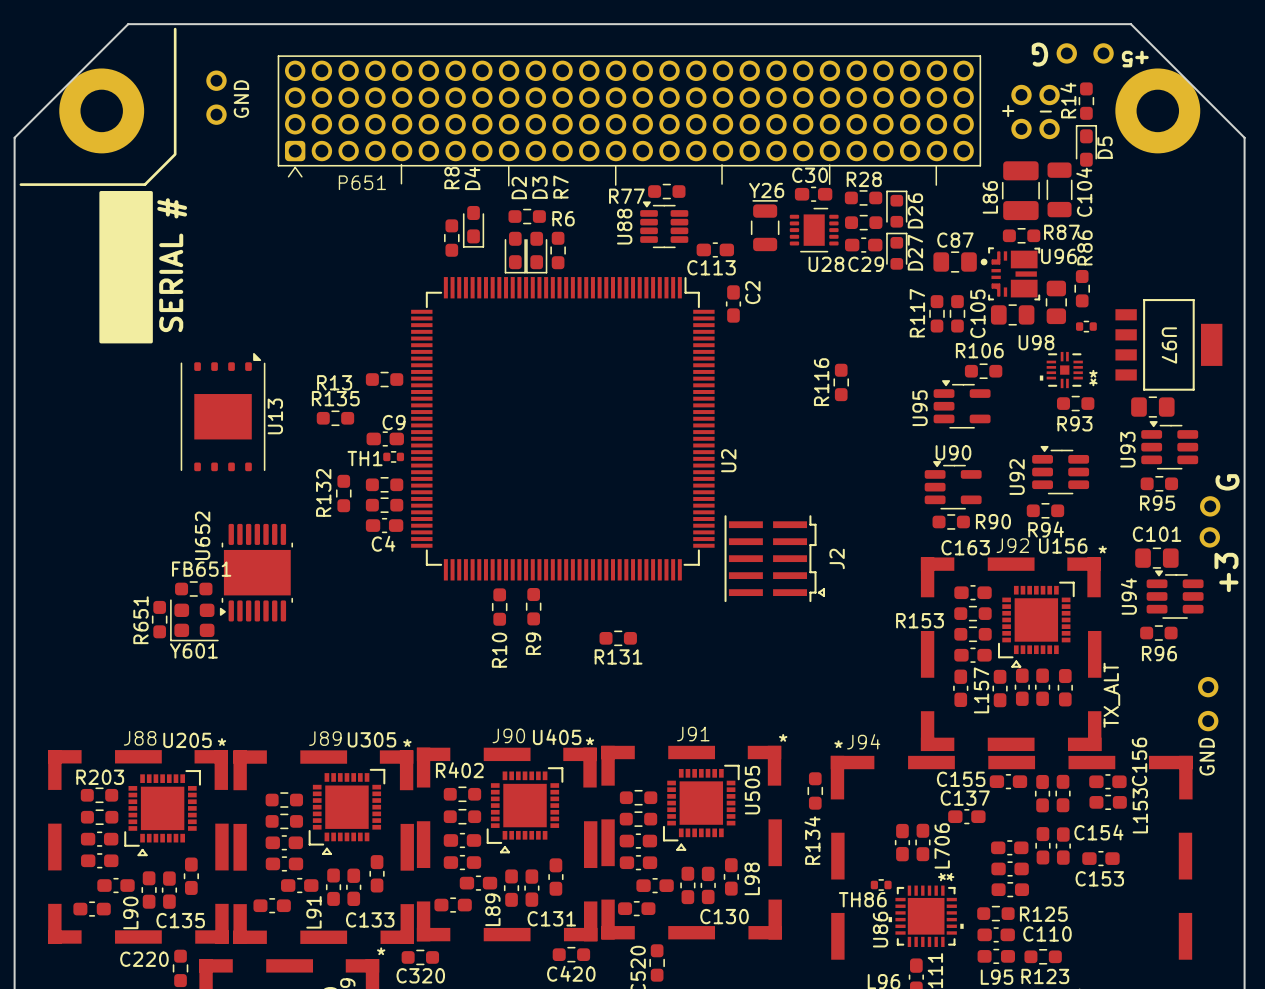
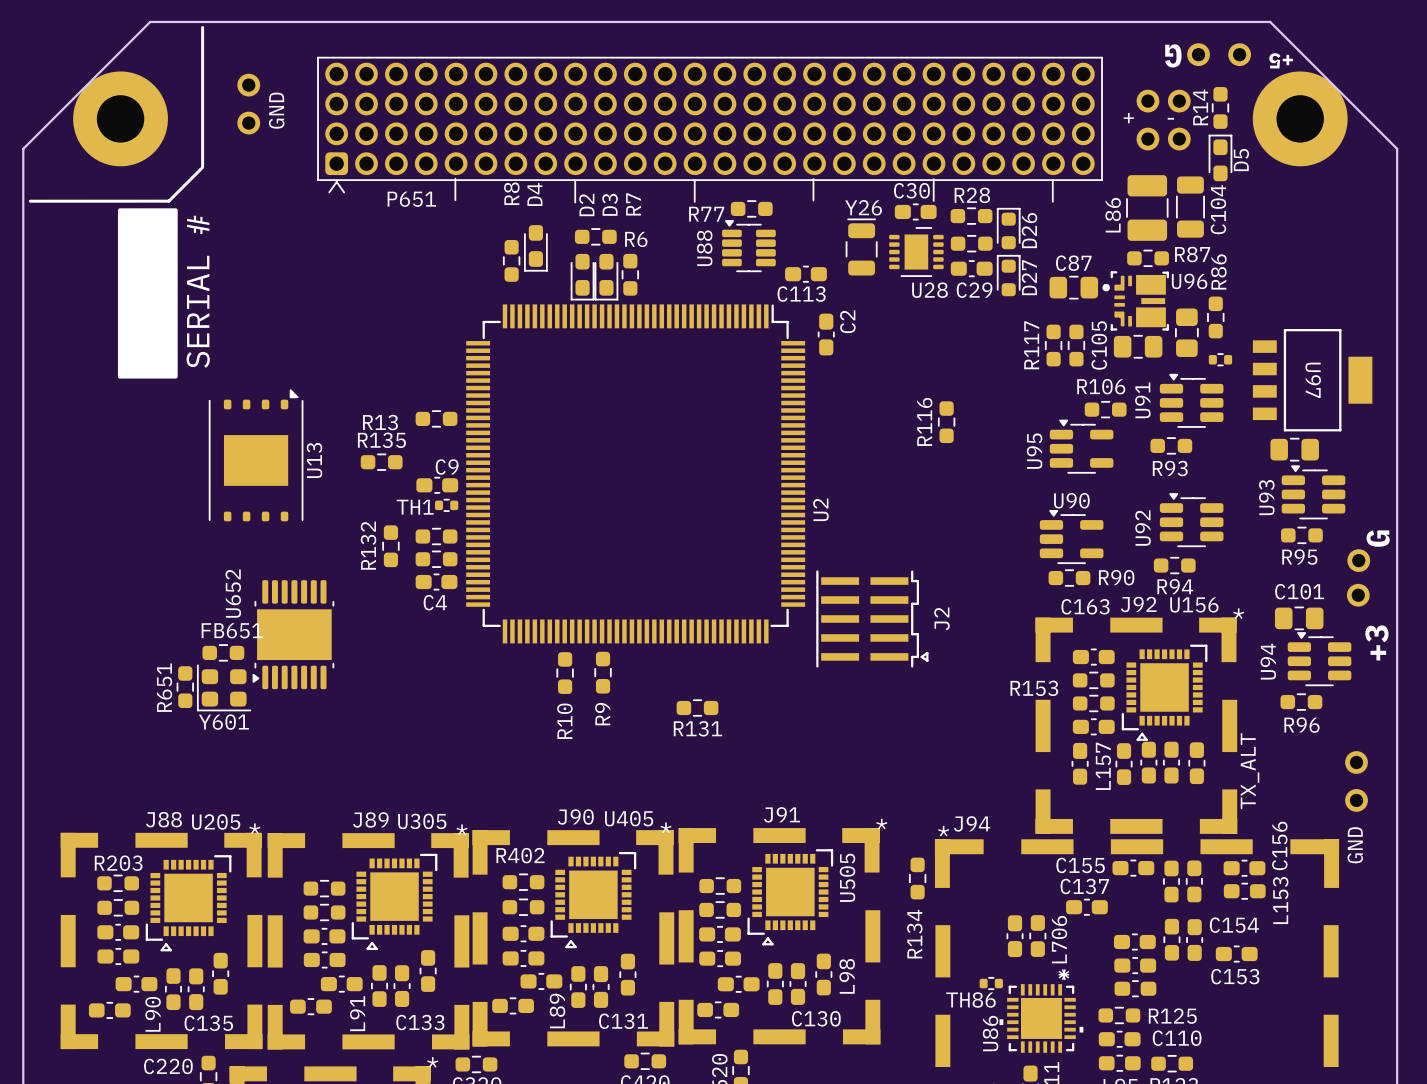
U91: none -> (1191, 400)
U98: (1061, 370) -> none
R93 position: (1075, 403) -> (1171, 445)

